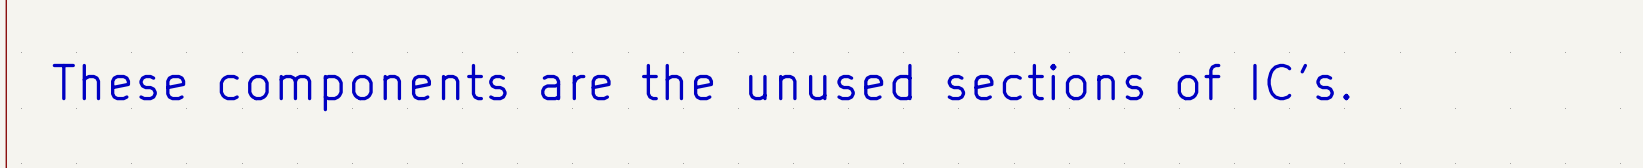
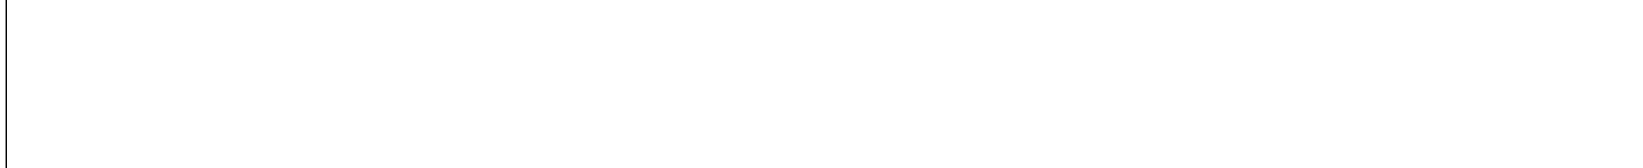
text: These components are the unused sections of IC's. (701, 87) -> none

